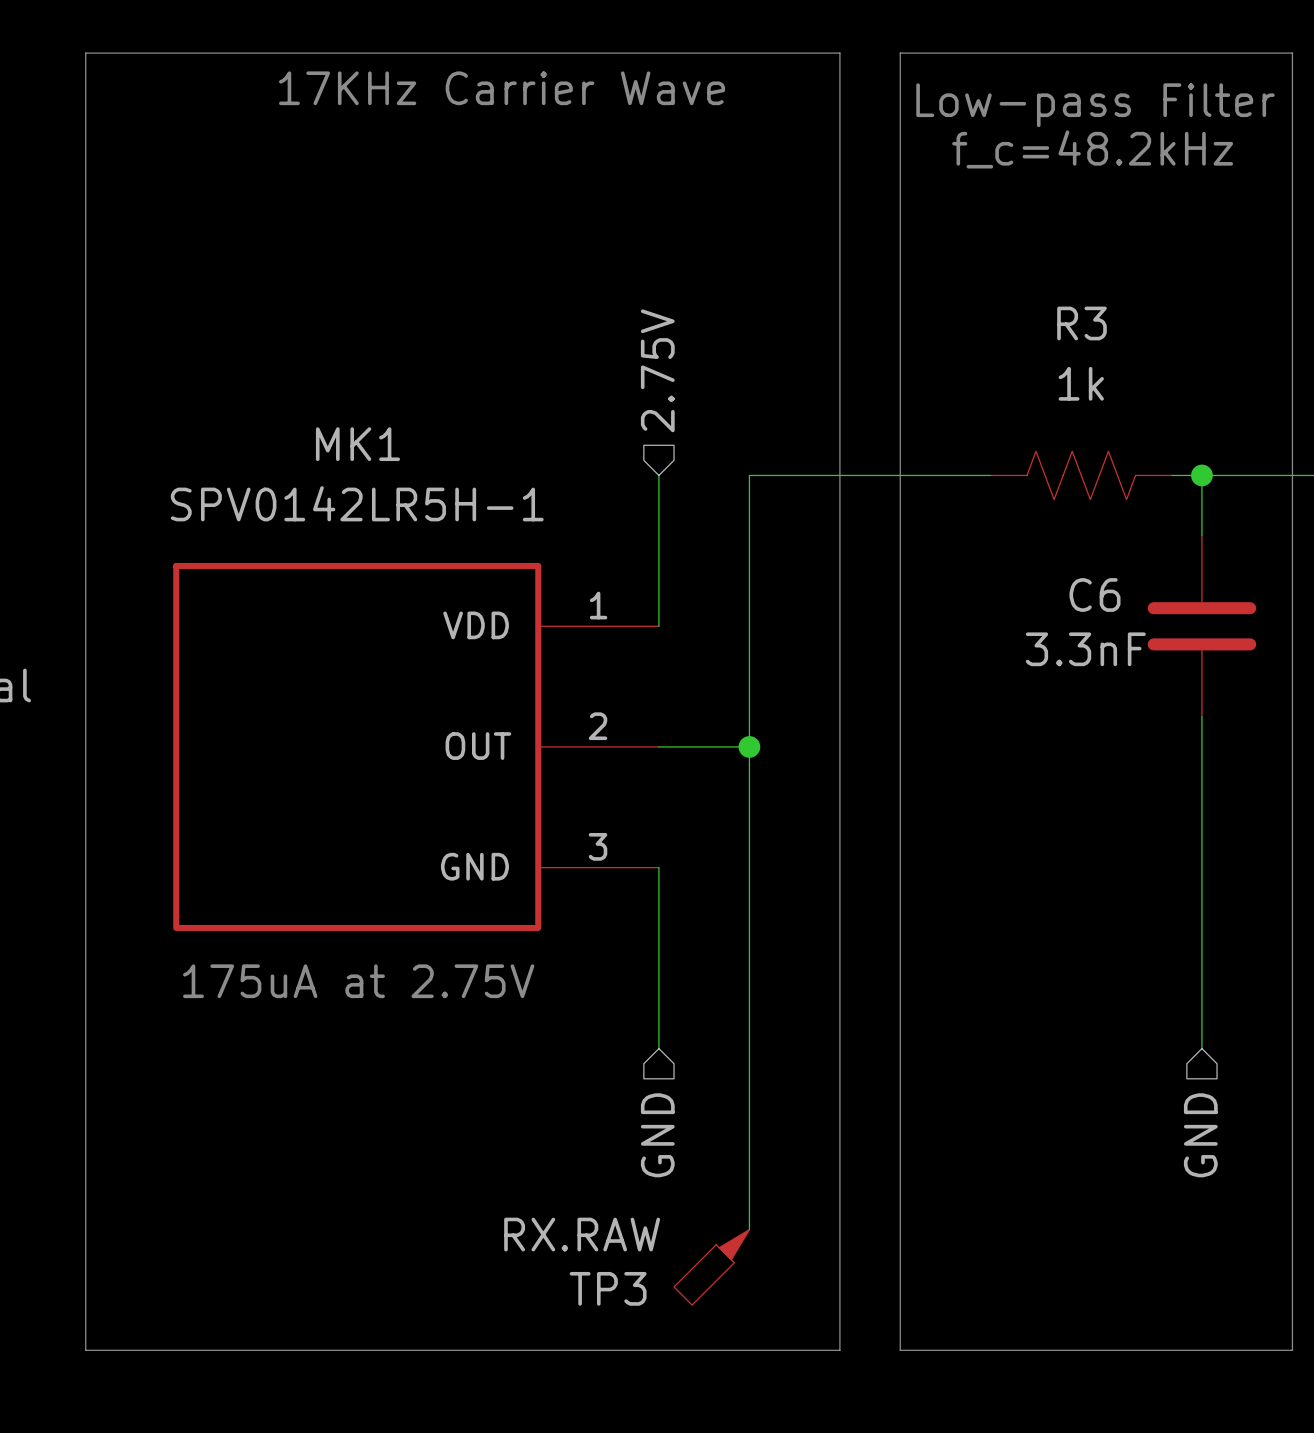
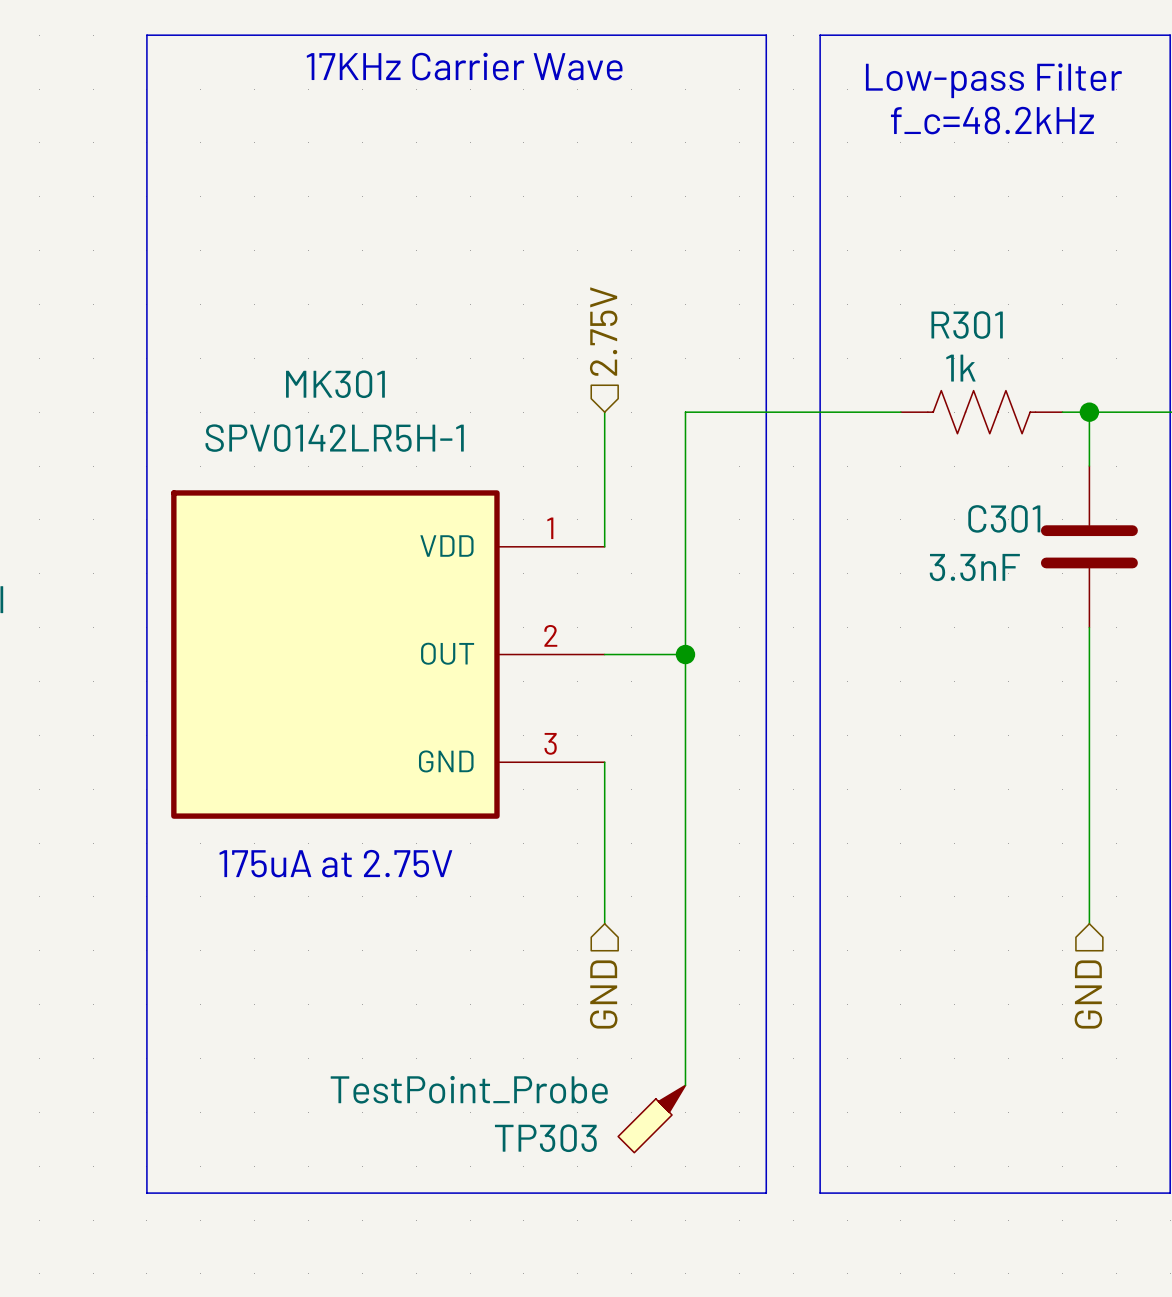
line: (146, 53) (85, 53) (85, 1350) (146, 1350) -> (146, 35) (146, 1193)
R3 name: R3 (1081, 323) -> R301 (967, 325)
R3 value position: 1k (1081, 383) -> 1k (960, 368)
MK1 name: MK1 (357, 444) -> MK301 (335, 384)
C6 name: C6 (1095, 594) -> C301 (1004, 518)
TP3 value: RX.RAW (582, 1234) -> TestPoint_Probe (469, 1089)
TP3 name: TP3 (608, 1288) -> TP303 (545, 1138)

